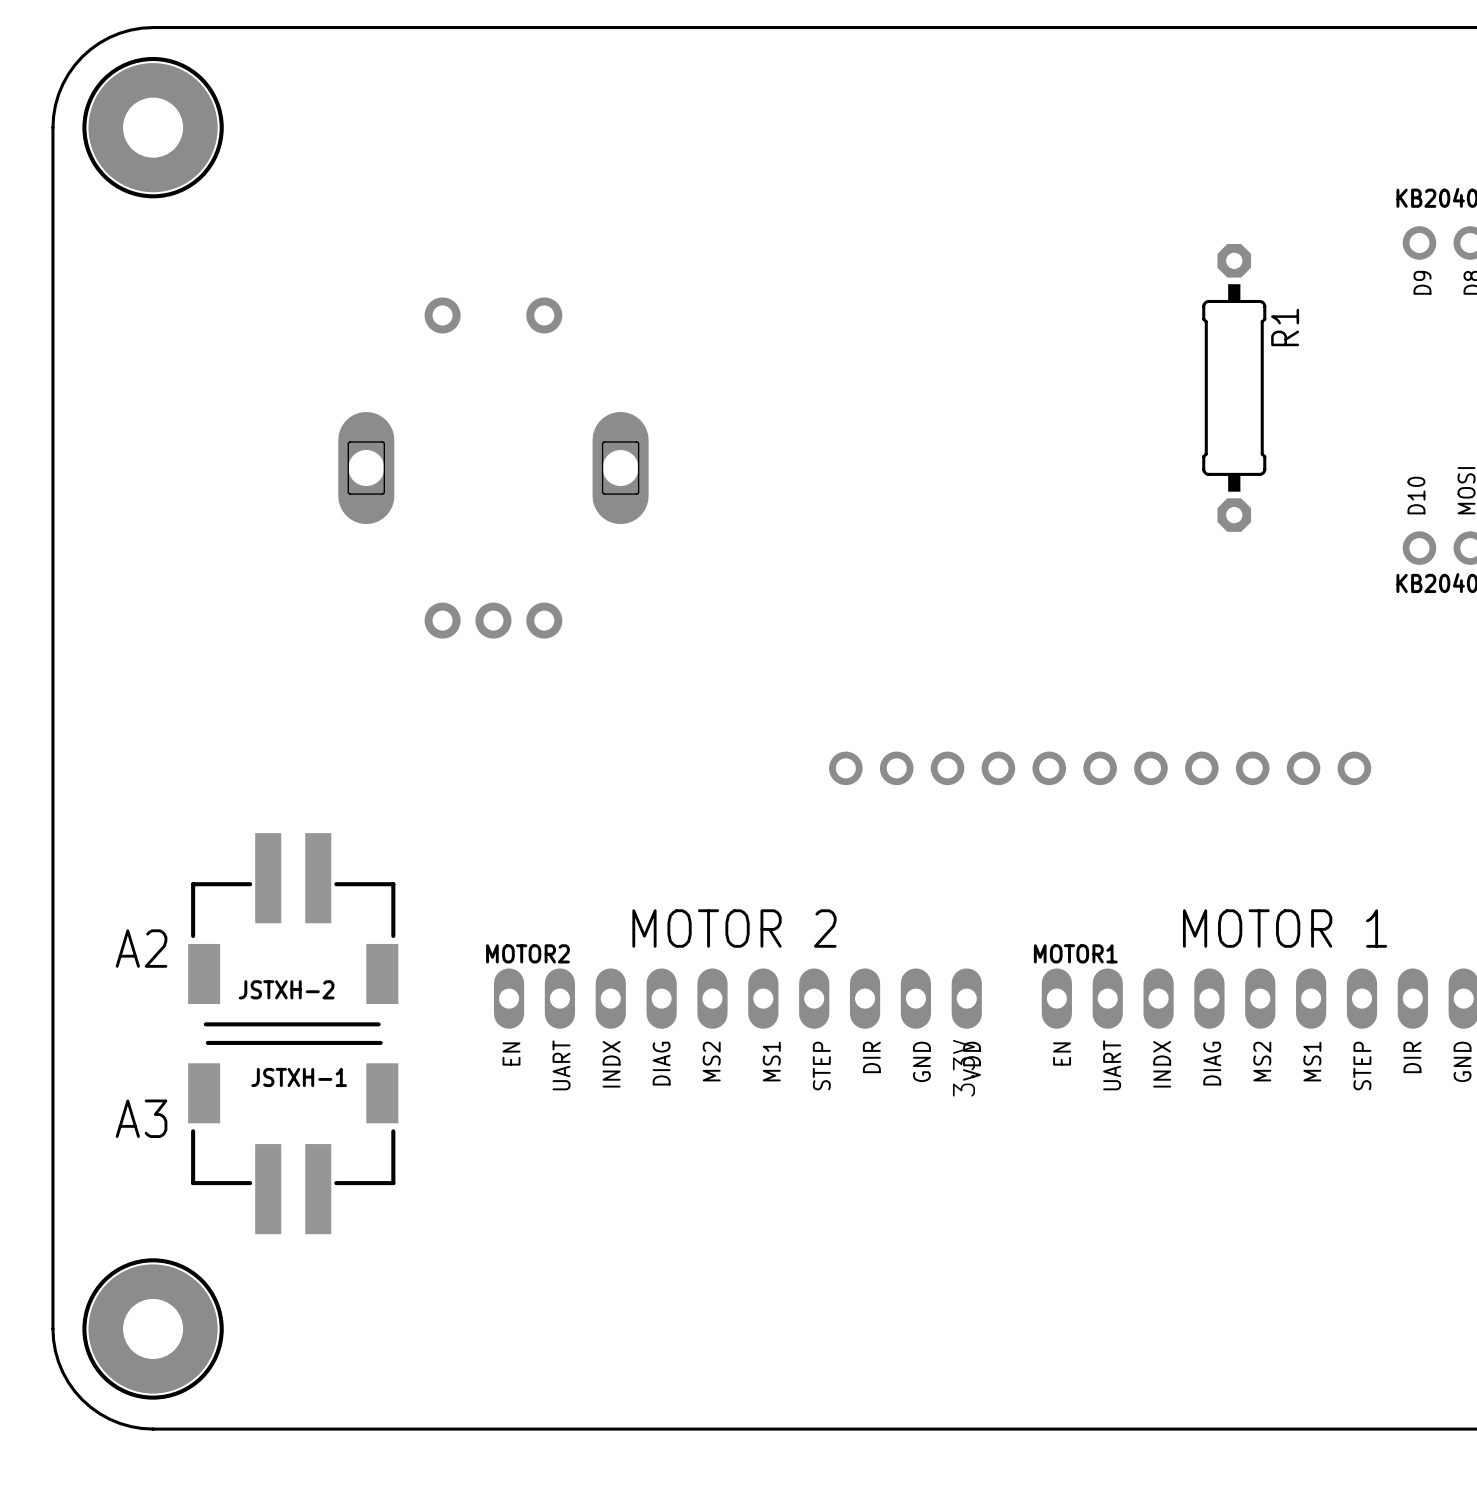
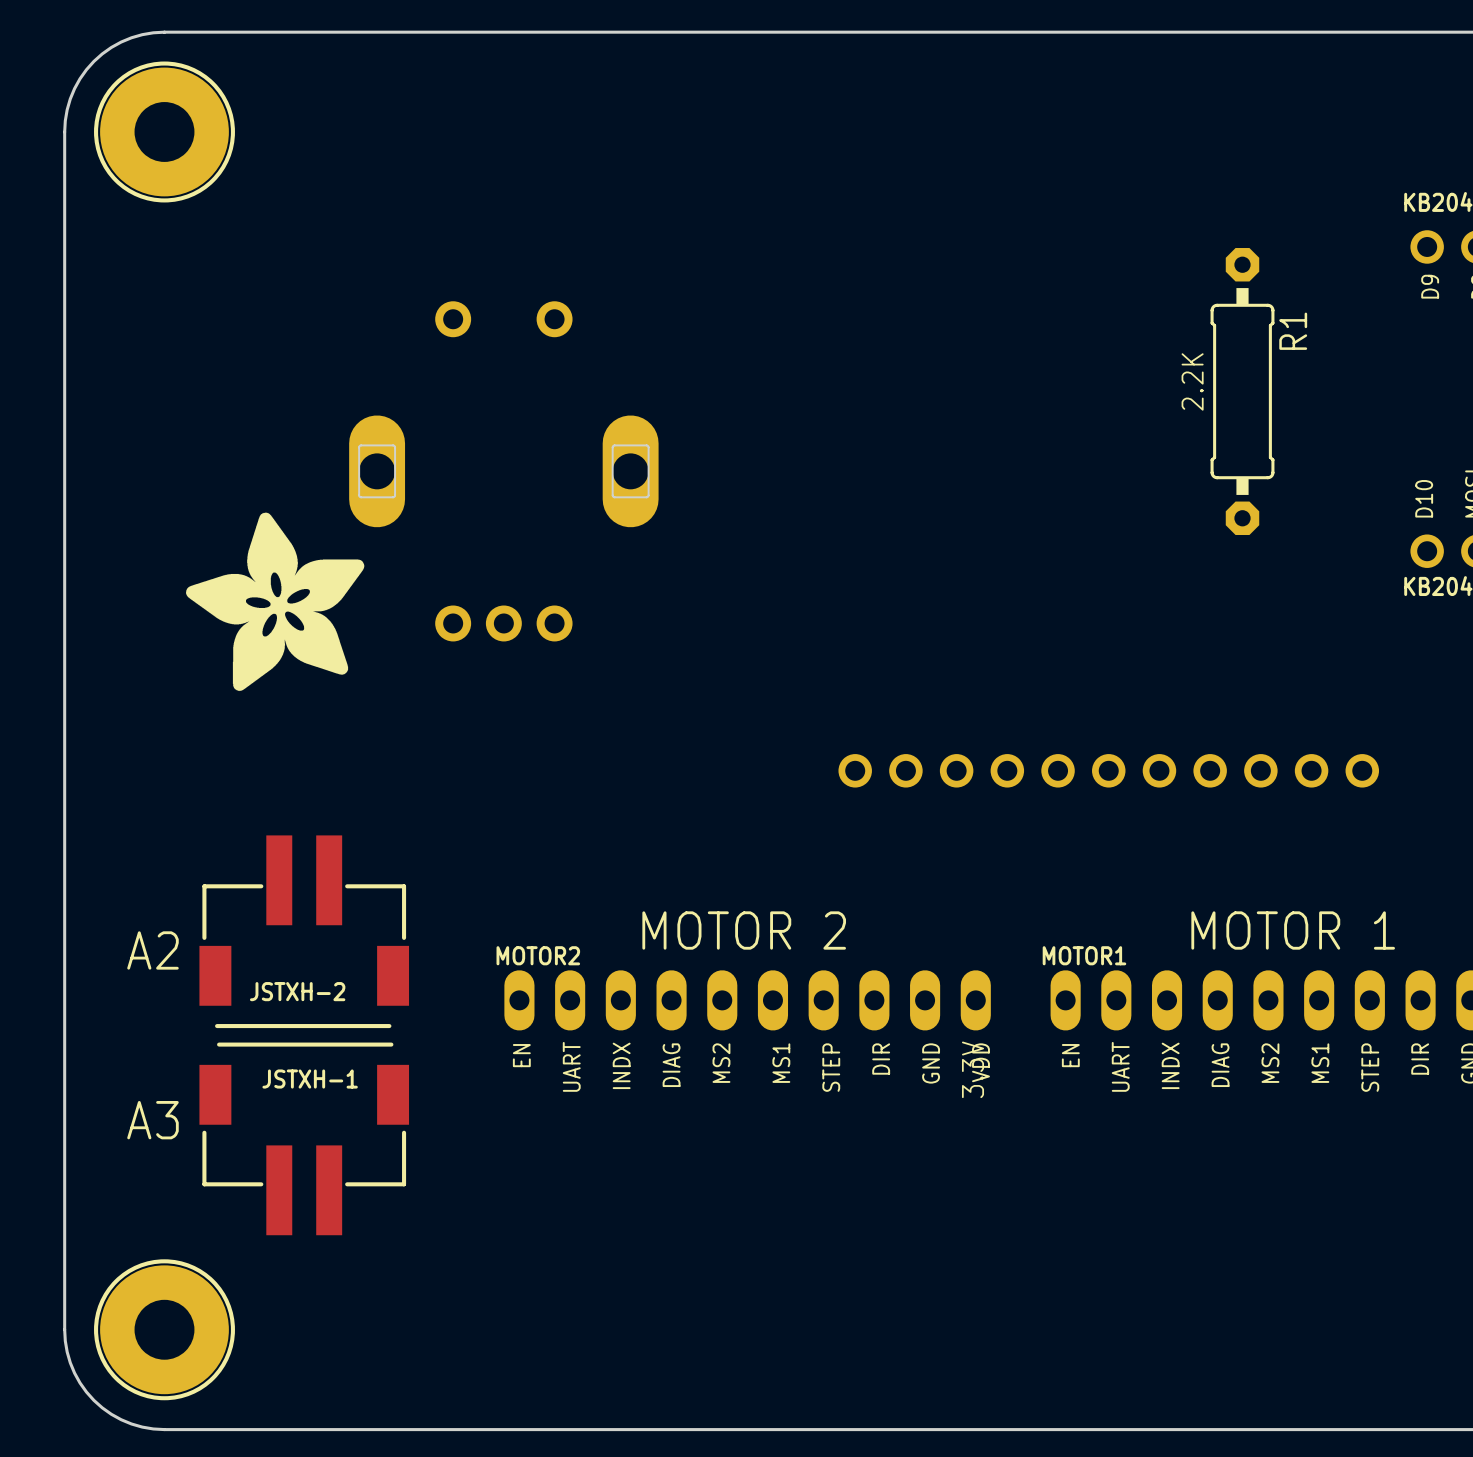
text: none -> 2.2K (1192, 381)
drawing: none -> [186, 512, 365, 692]

